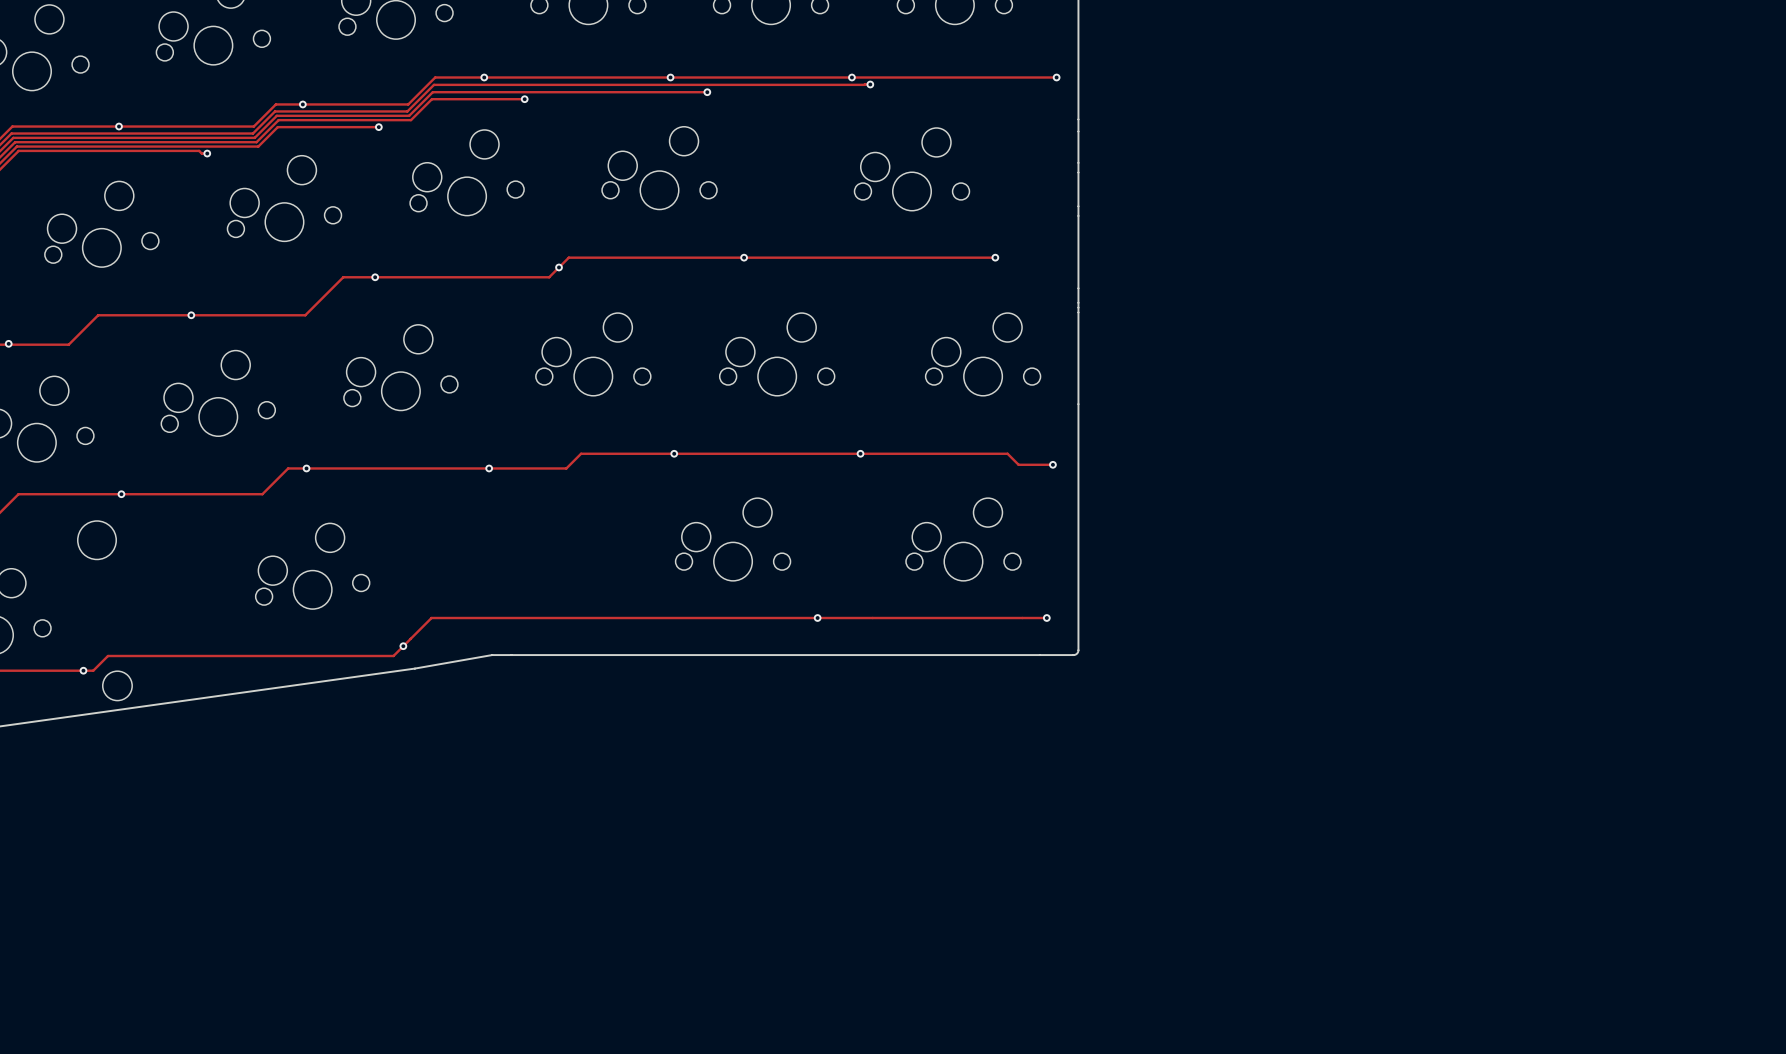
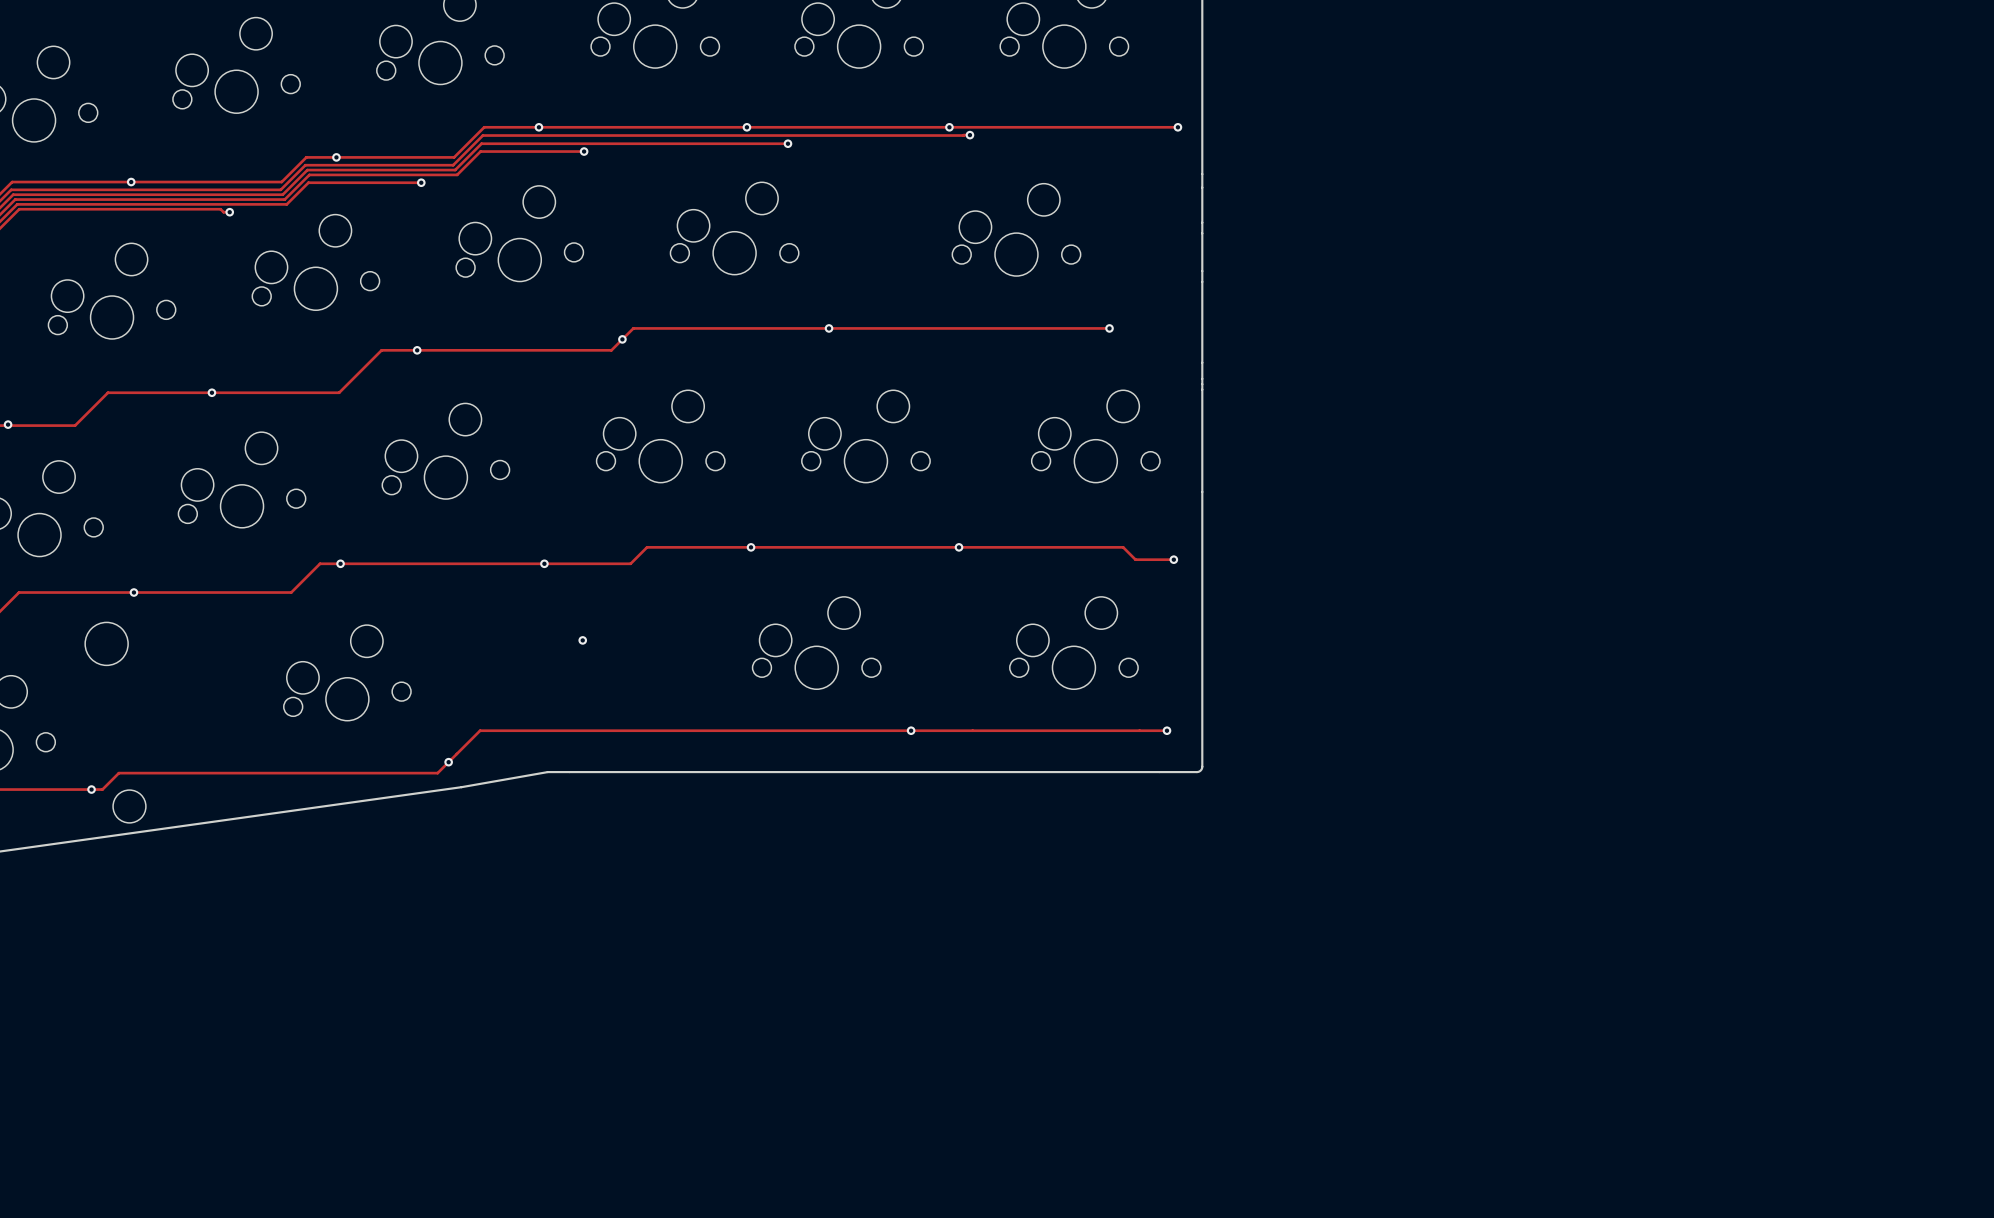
via: none -> (582, 640)

